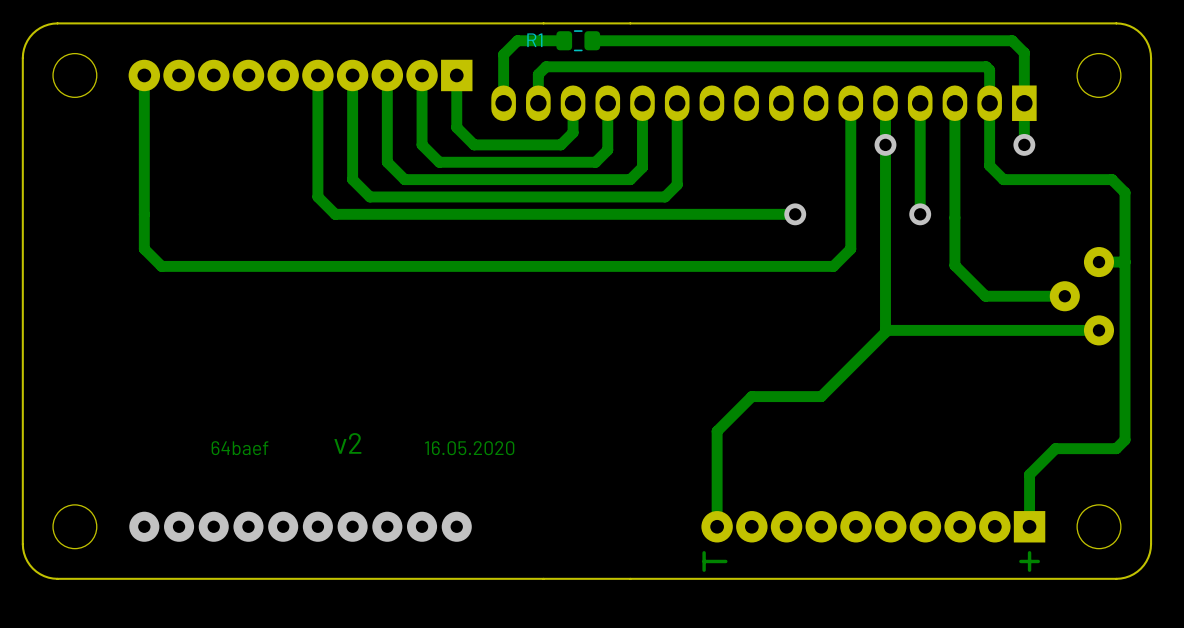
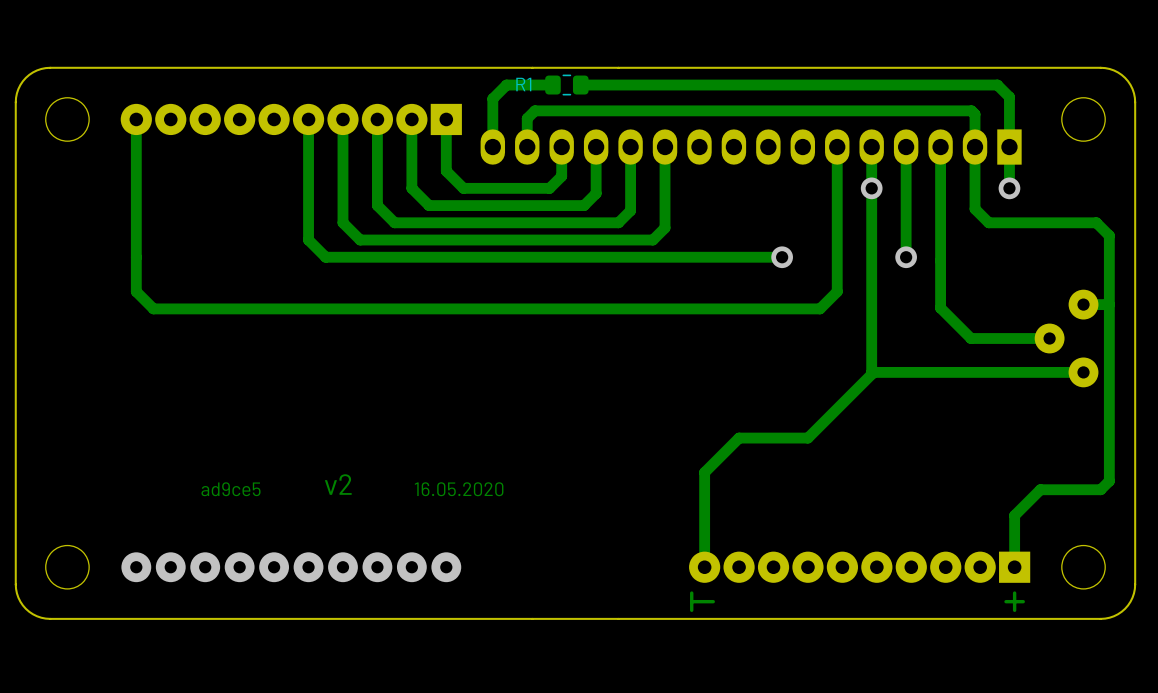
text: 64baef (240, 448) -> ad9ce5 (231, 489)

